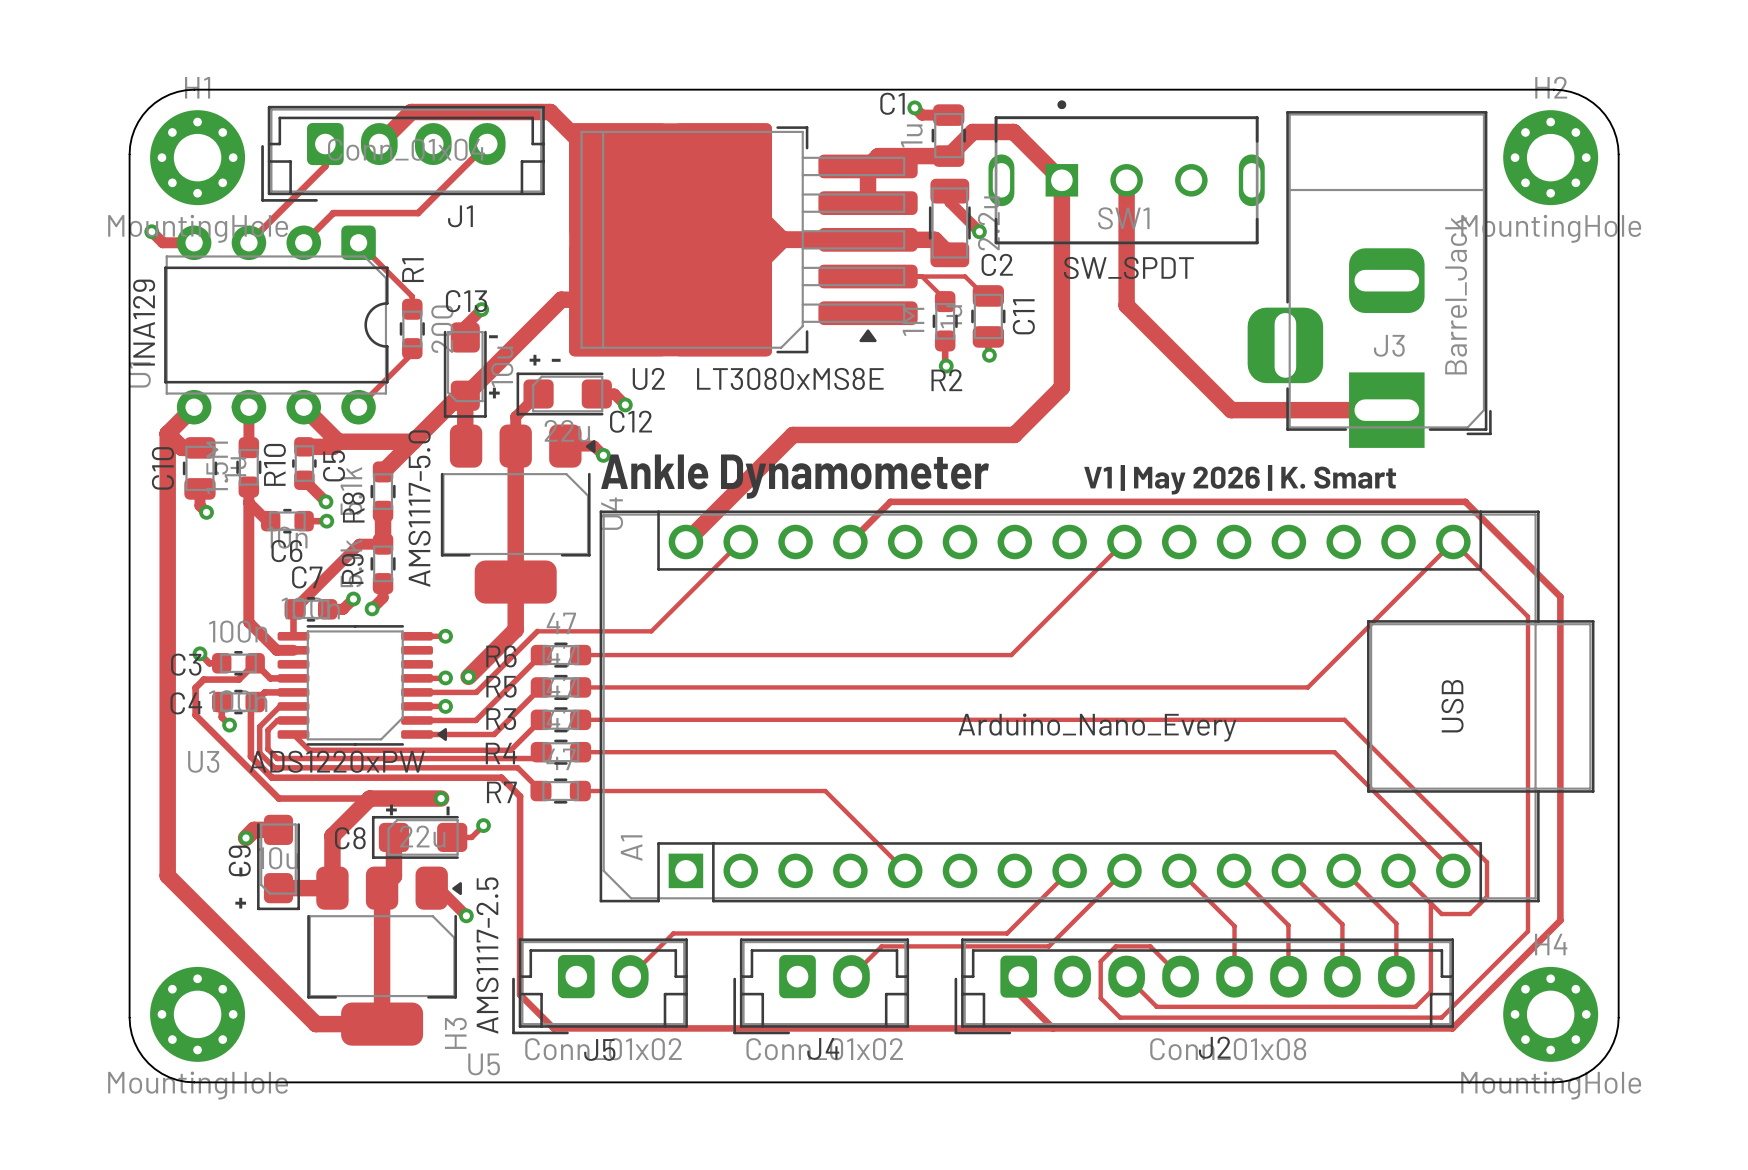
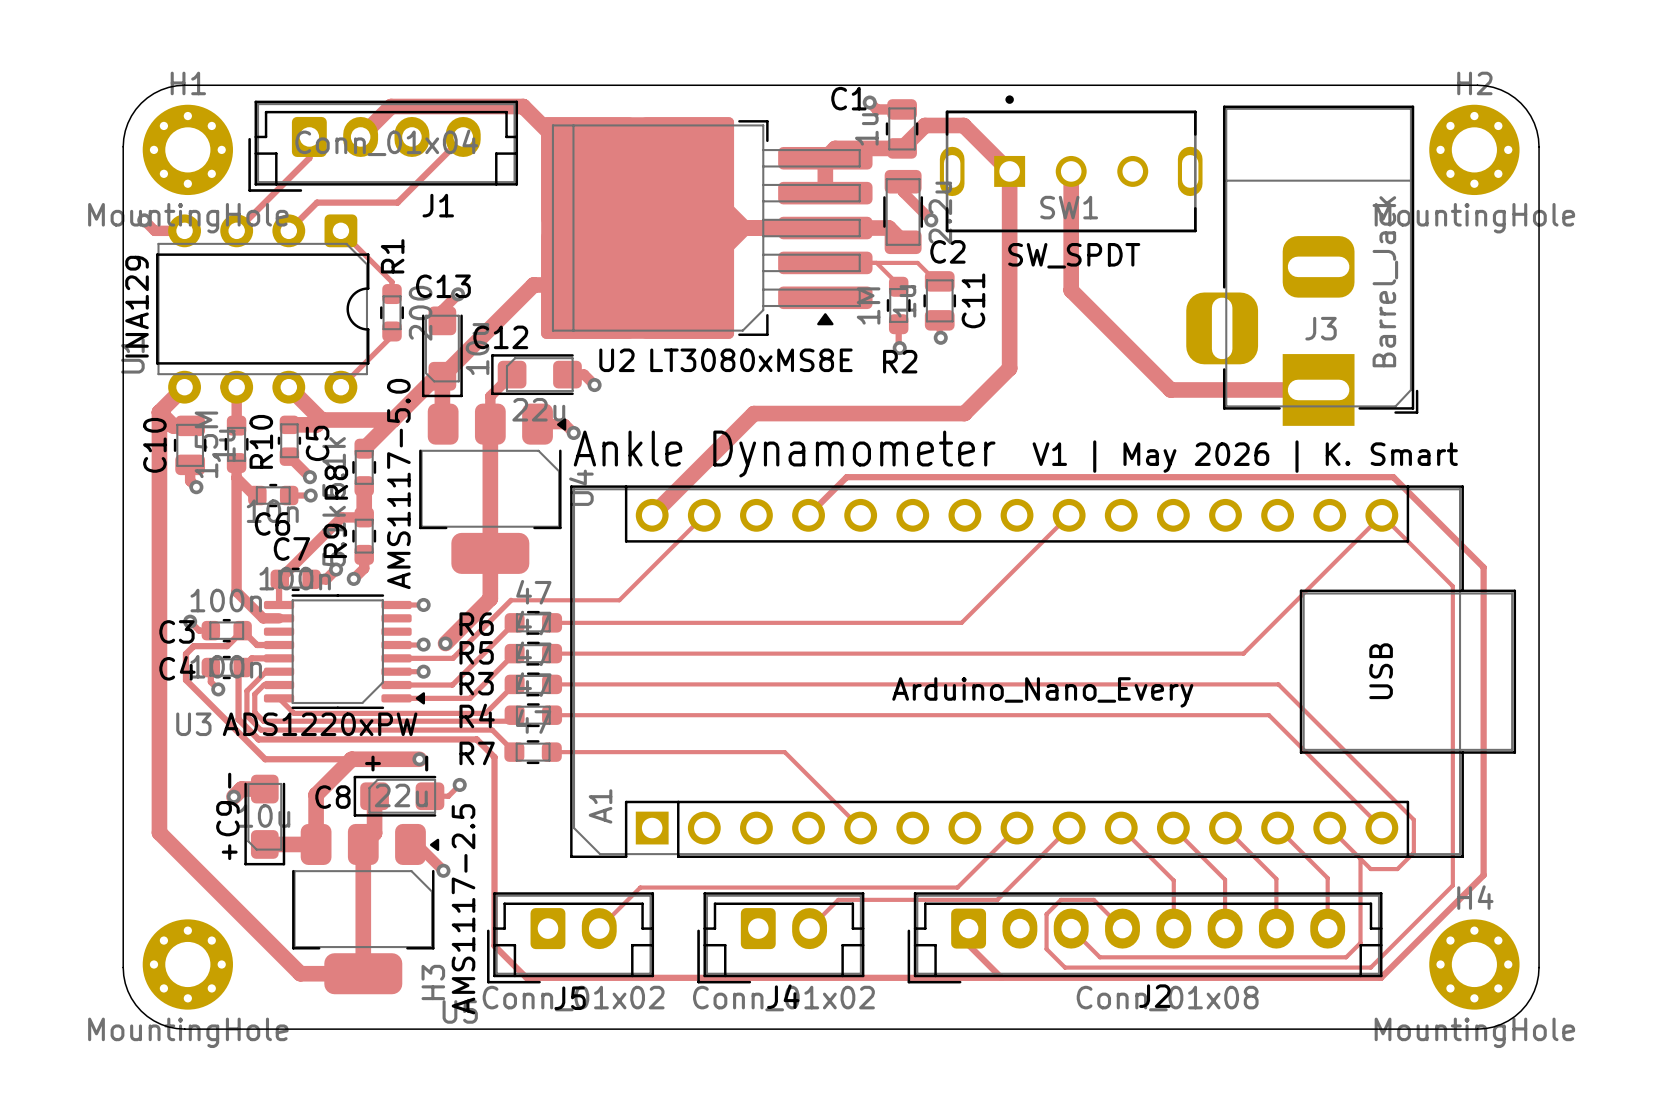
text: - (493, 336) -> none
text: + - (545, 360) -> none
text: + (494, 393) -> none
C12 name position: C12 (631, 421) -> C12 (500, 337)

